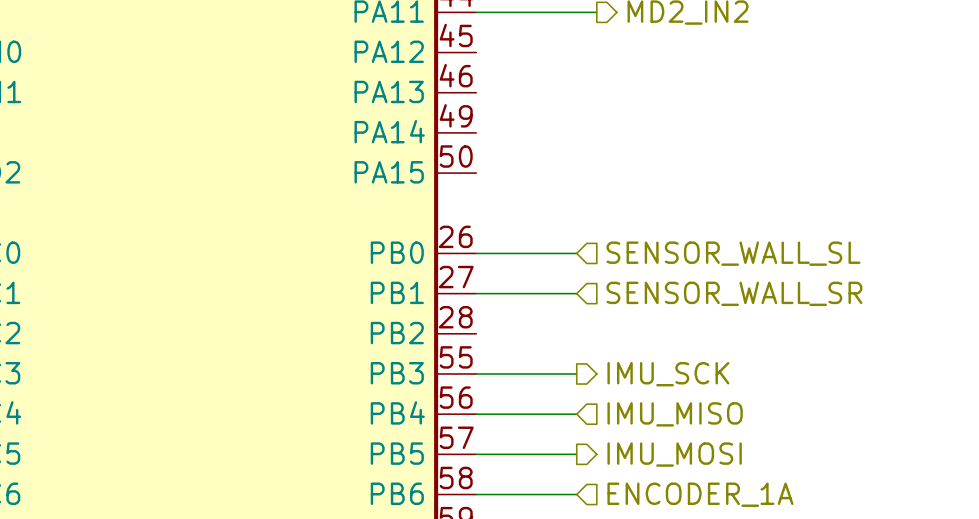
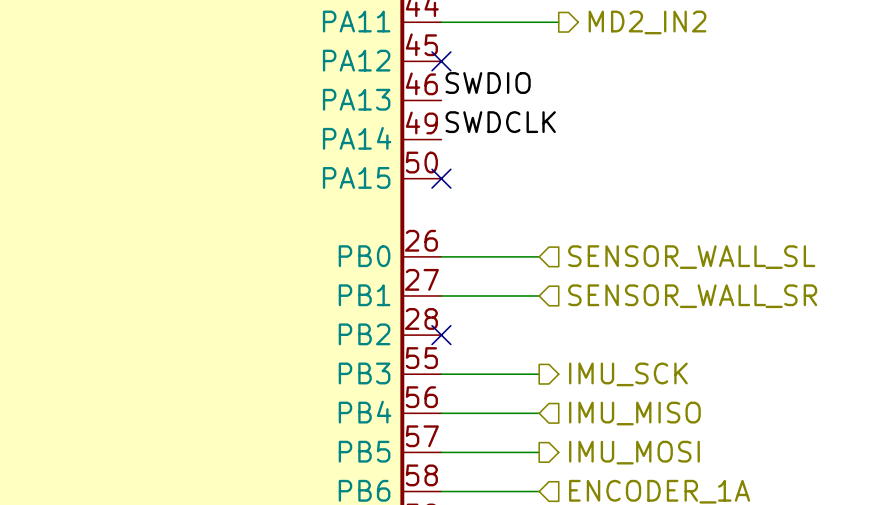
no-connect mark: none -> (441, 61)
label: none -> SWDIO (488, 83)
label: none -> SWDCLK (500, 122)
no-connect mark: none -> (441, 178)
no-connect mark: none -> (441, 335)

